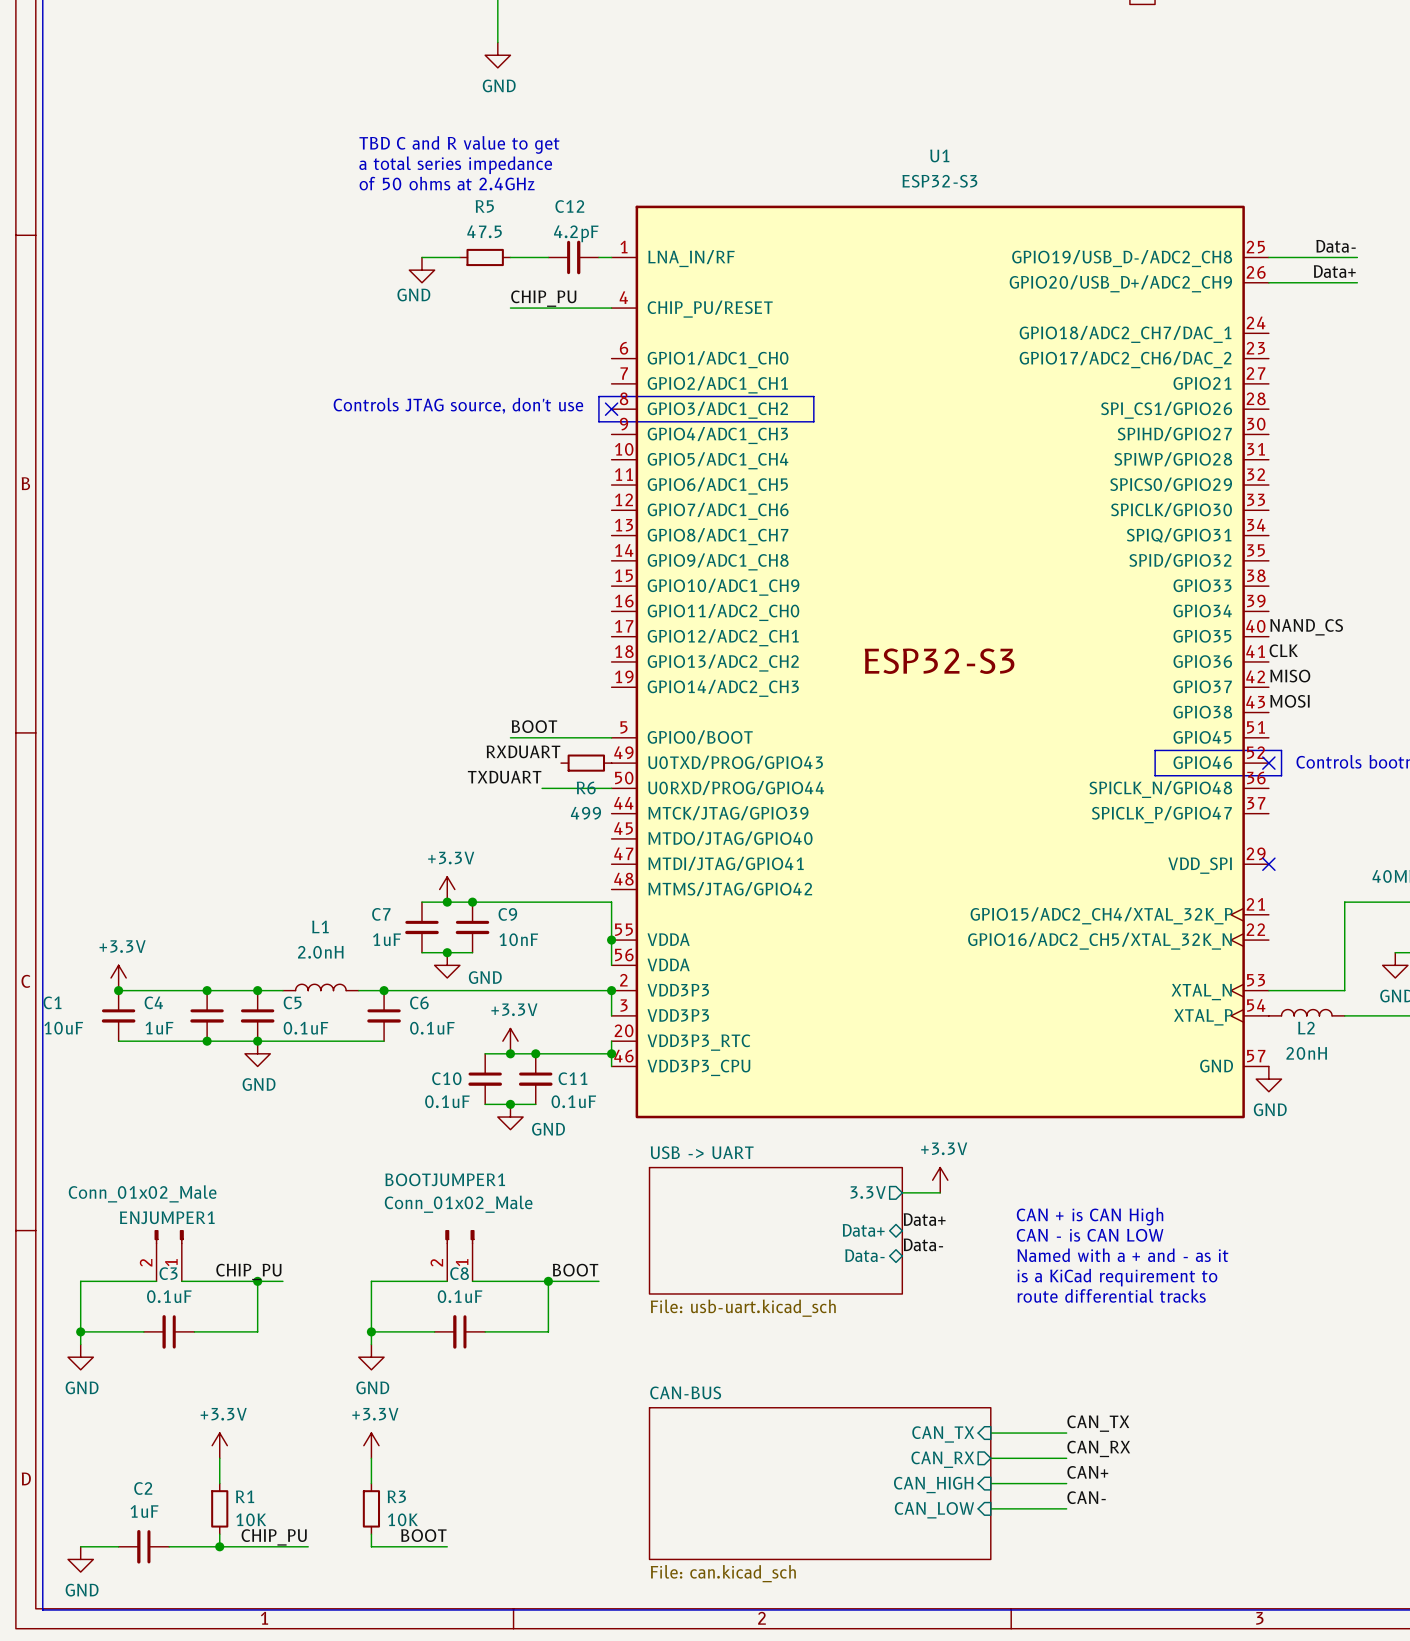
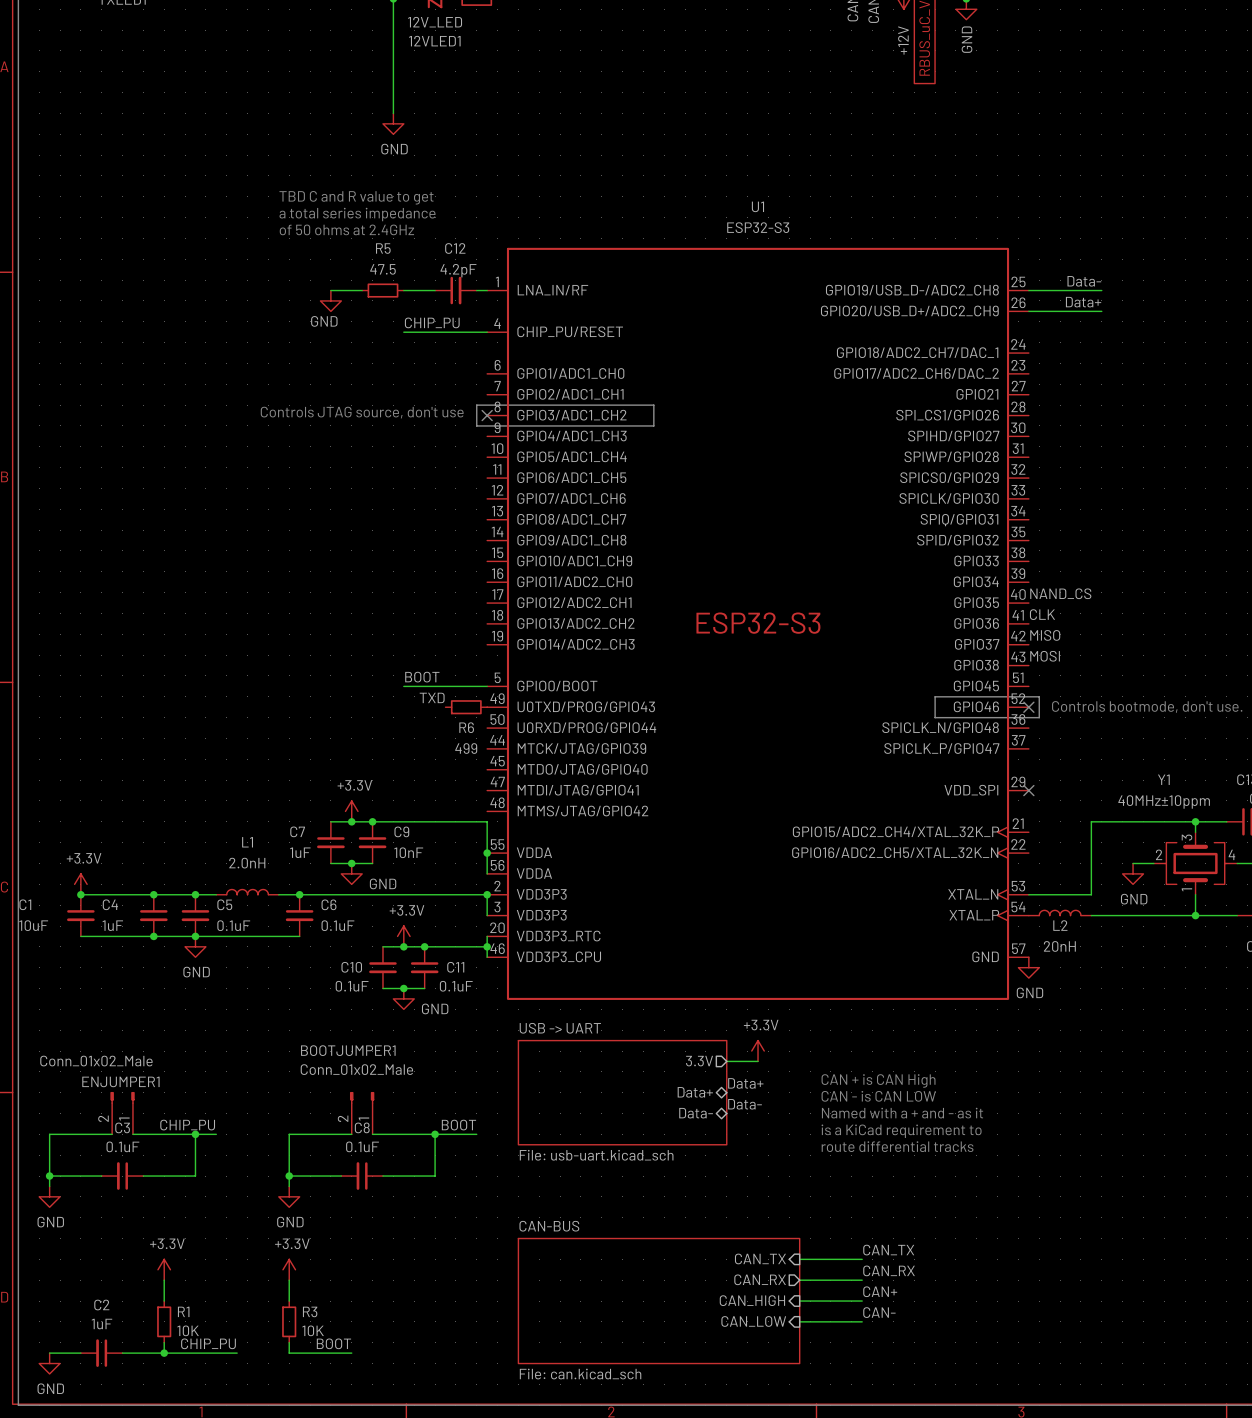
label: RXDUART (523, 751) -> TXD (432, 697)
label: TXDUART (504, 777) -> none
wire: (542, 788) (611, 788) -> none

